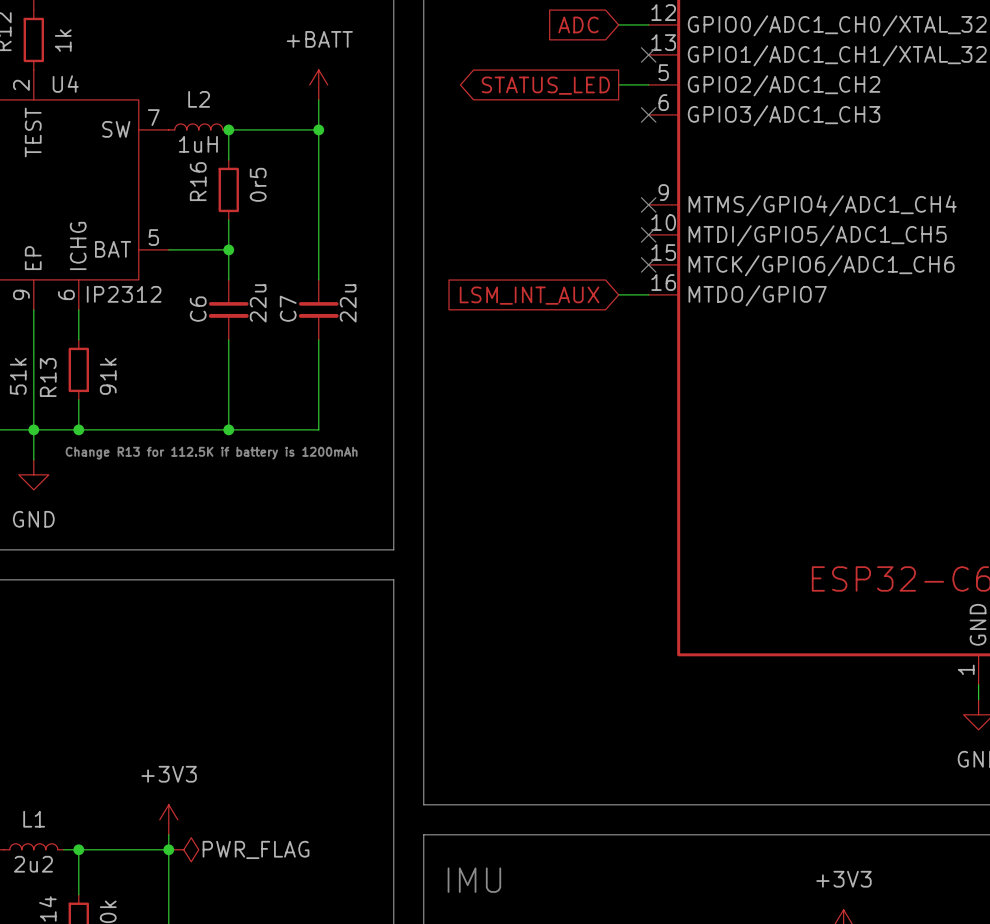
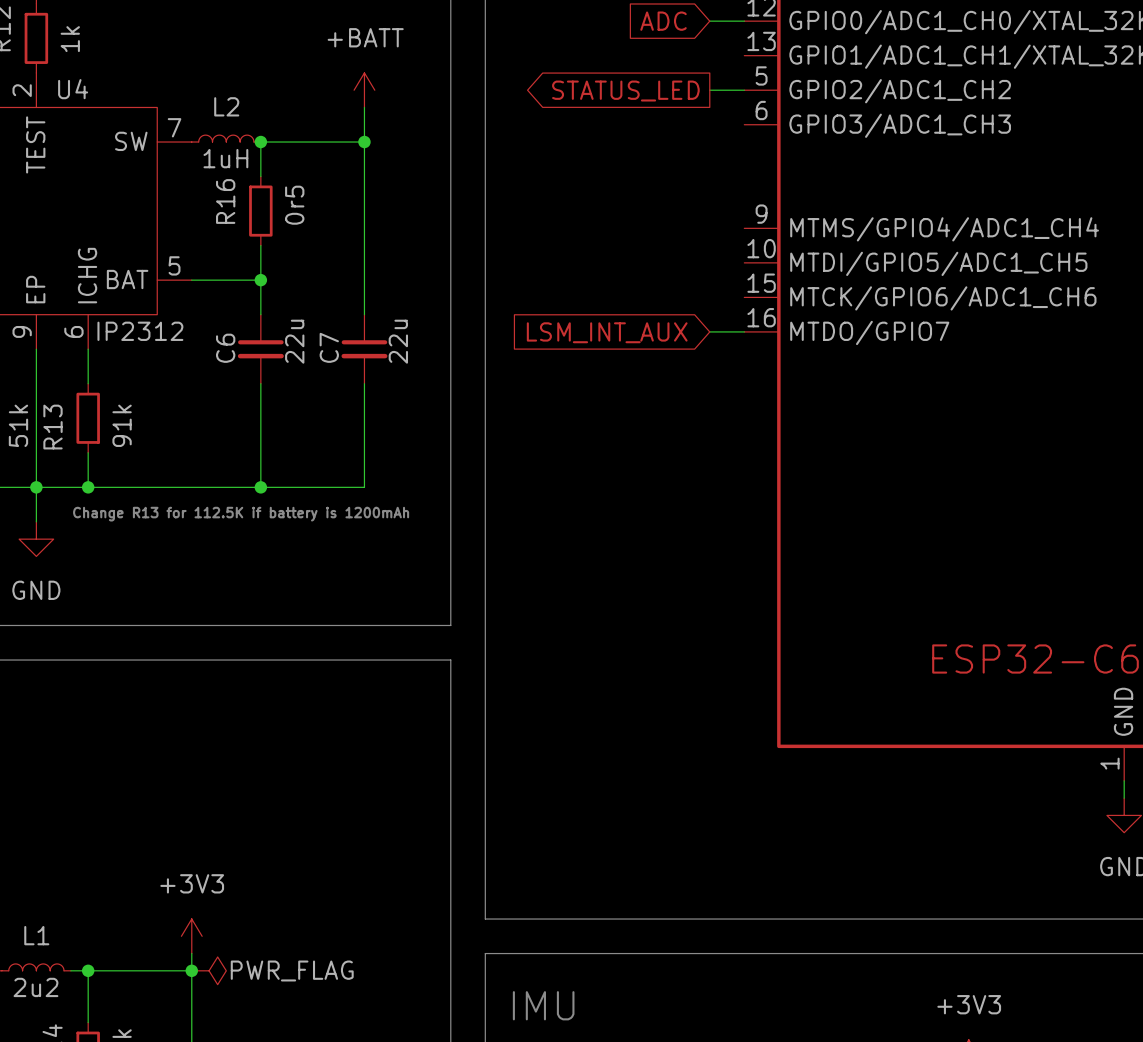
no-connect mark: (648, 54) -> none
no-connect mark: (648, 114) -> none
no-connect mark: (648, 204) -> none
no-connect mark: (648, 234) -> none
no-connect mark: (648, 264) -> none

